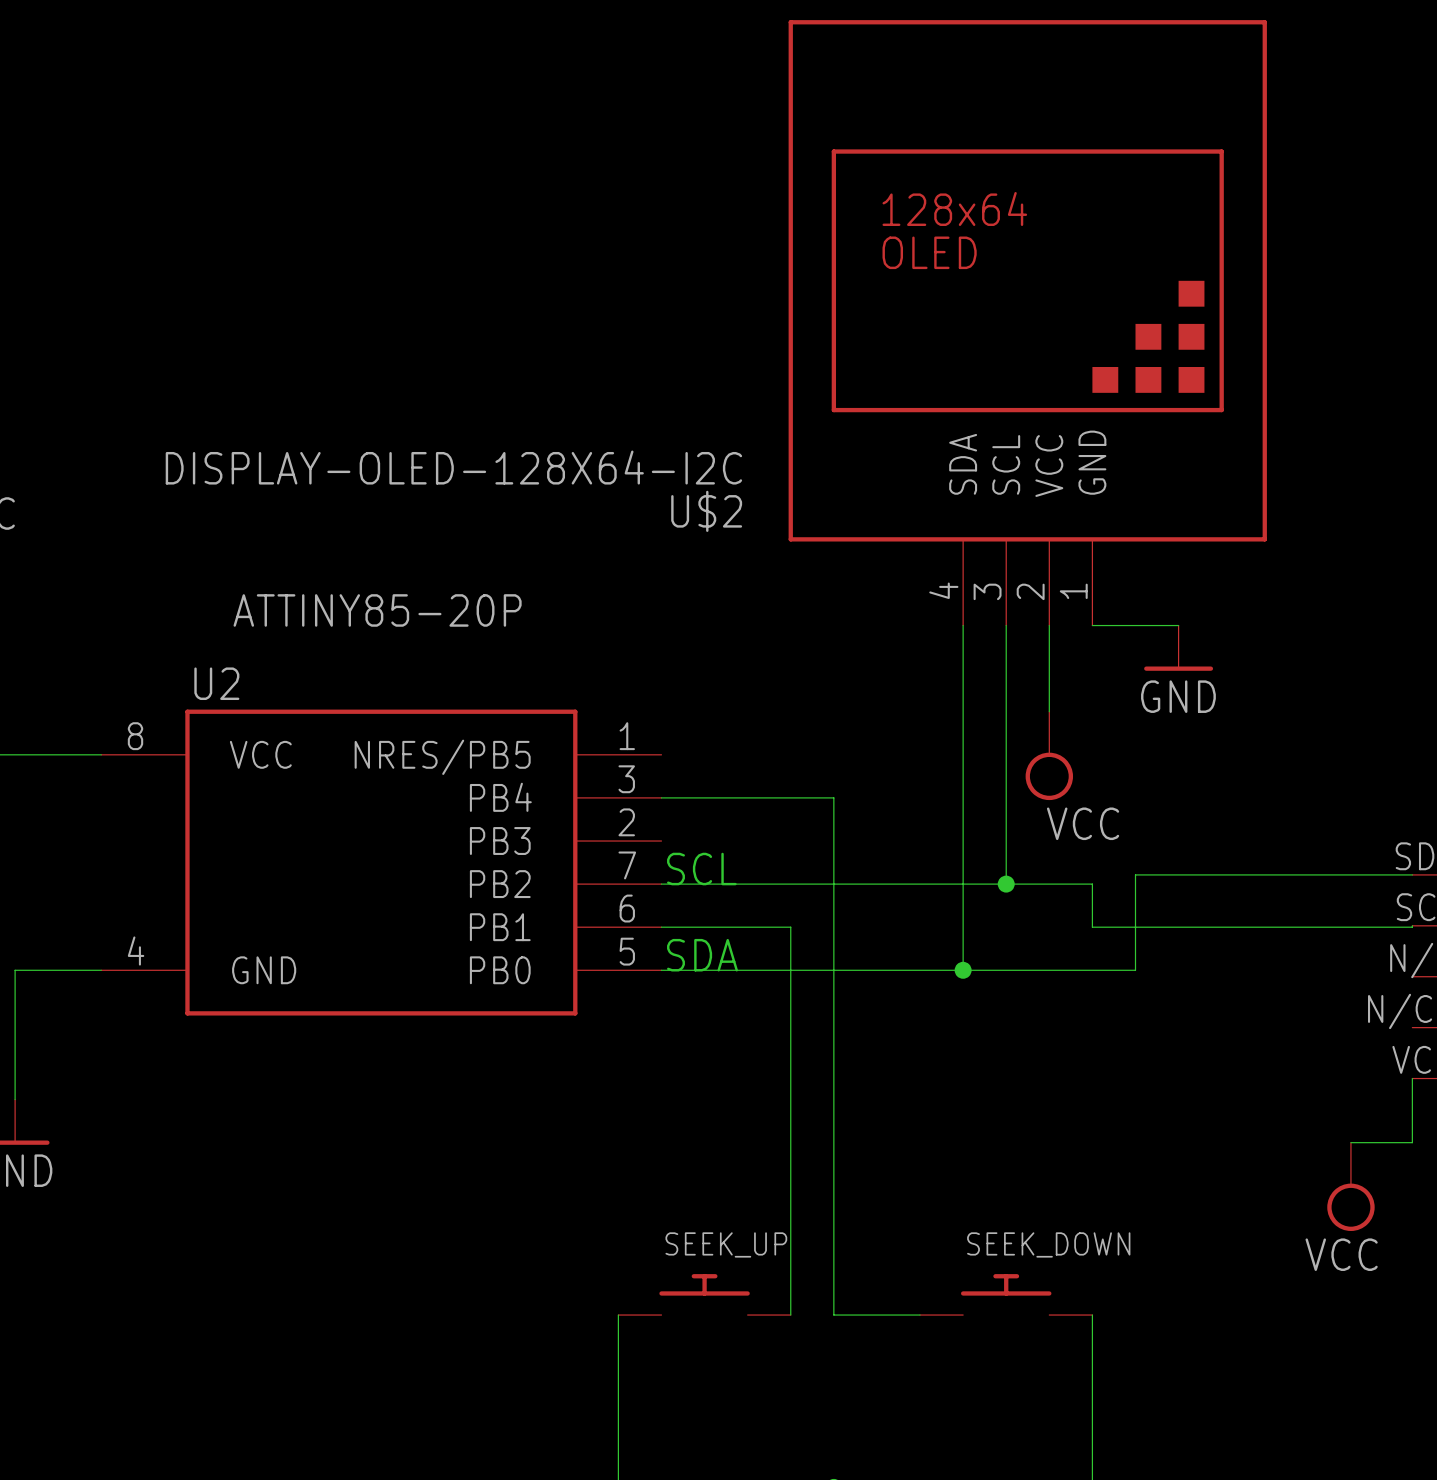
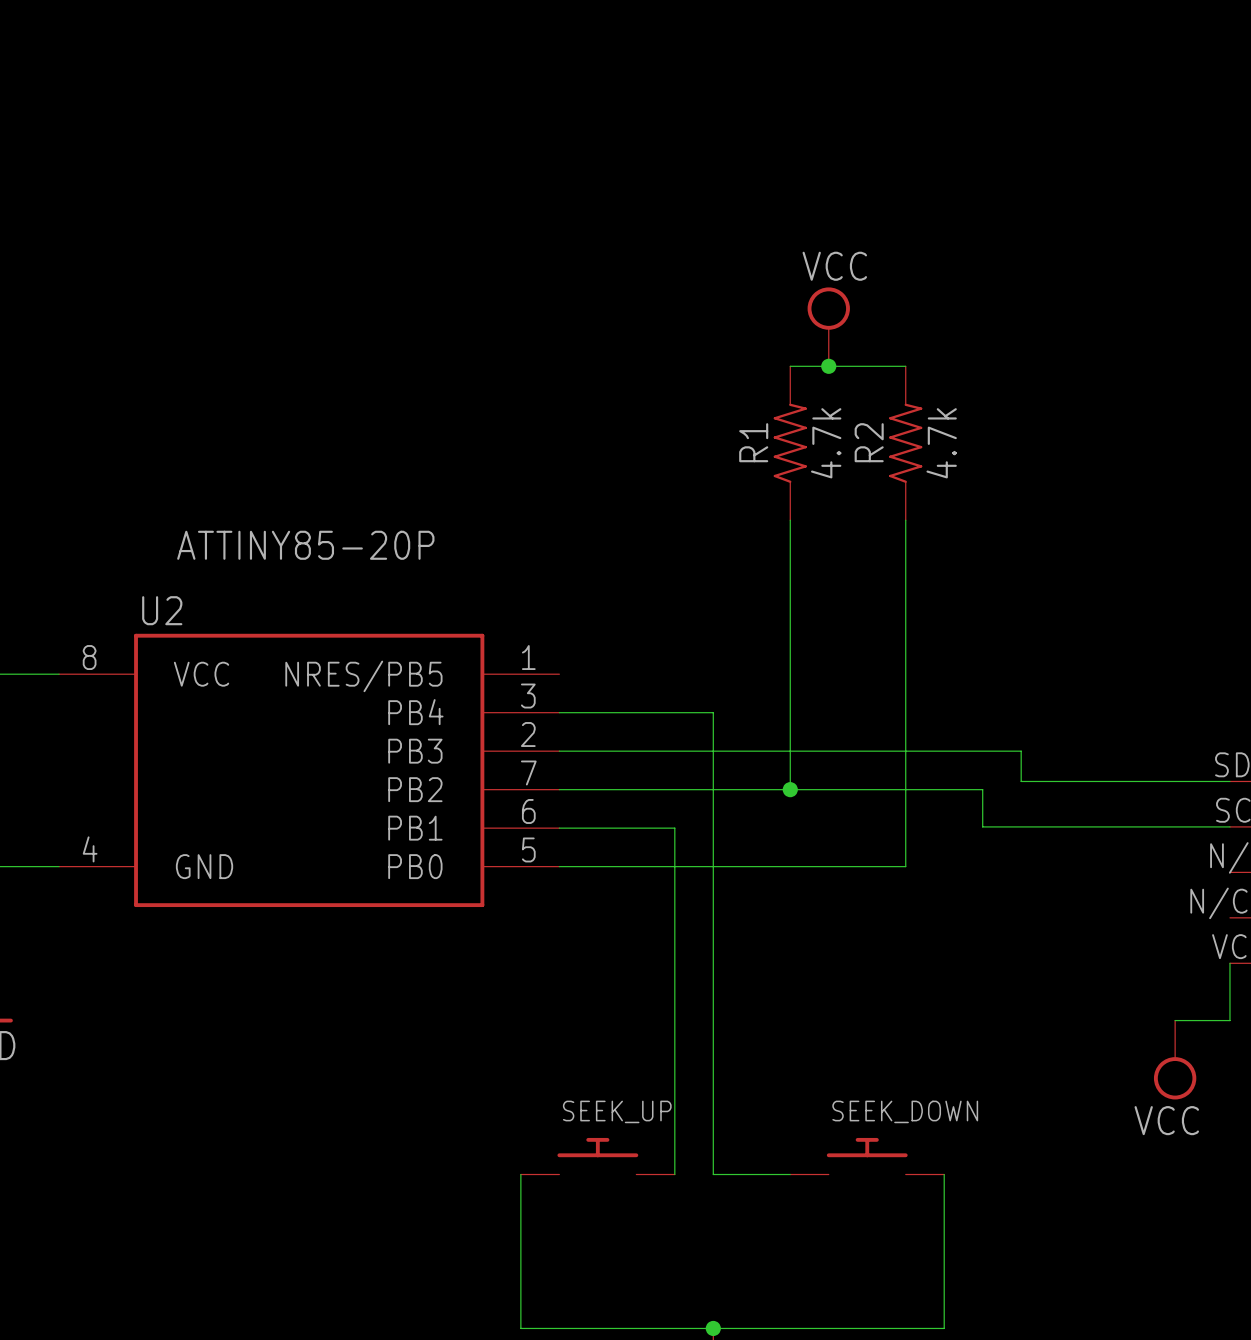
U$2: DISPLAY-OLED-128X64-I2C (1027, 322) -> none
junction: none -> (828, 366)
R1: none -> 4.7k (790, 443)
R2: none -> 4.7k (905, 443)
wire: none -> (790, 520) (790, 789)
wire: (963, 625) (963, 970) -> none
wire: (1006, 625) (1006, 884) -> none
wire: (1092, 625) (1178, 625) -> none
power symbol: GND (1178, 648) -> none
power symbol position: VCC (1049, 755) -> VCC (828, 326)
power symbol rotation: 0° (1049, 776) -> 180° (828, 308)
power symbol text position: VCC (1083, 823) -> VCC (834, 266)
wire: none -> (559, 751) (1021, 751) (1021, 781)
text: SCL (701, 869) -> none
wire: (1178, 874) (1135, 874) (1135, 884) -> (944, 789) (982, 789)
junction: none -> (790, 789)
junction: (1006, 884) -> none
wire: (1092, 884) (1092, 927) (1412, 925) -> (982, 826) (1229, 826)
wire: (1135, 925) (1135, 970) (1049, 970) -> (905, 635) (905, 866)
text: SDA (702, 955) -> none
junction: (963, 970) -> none

